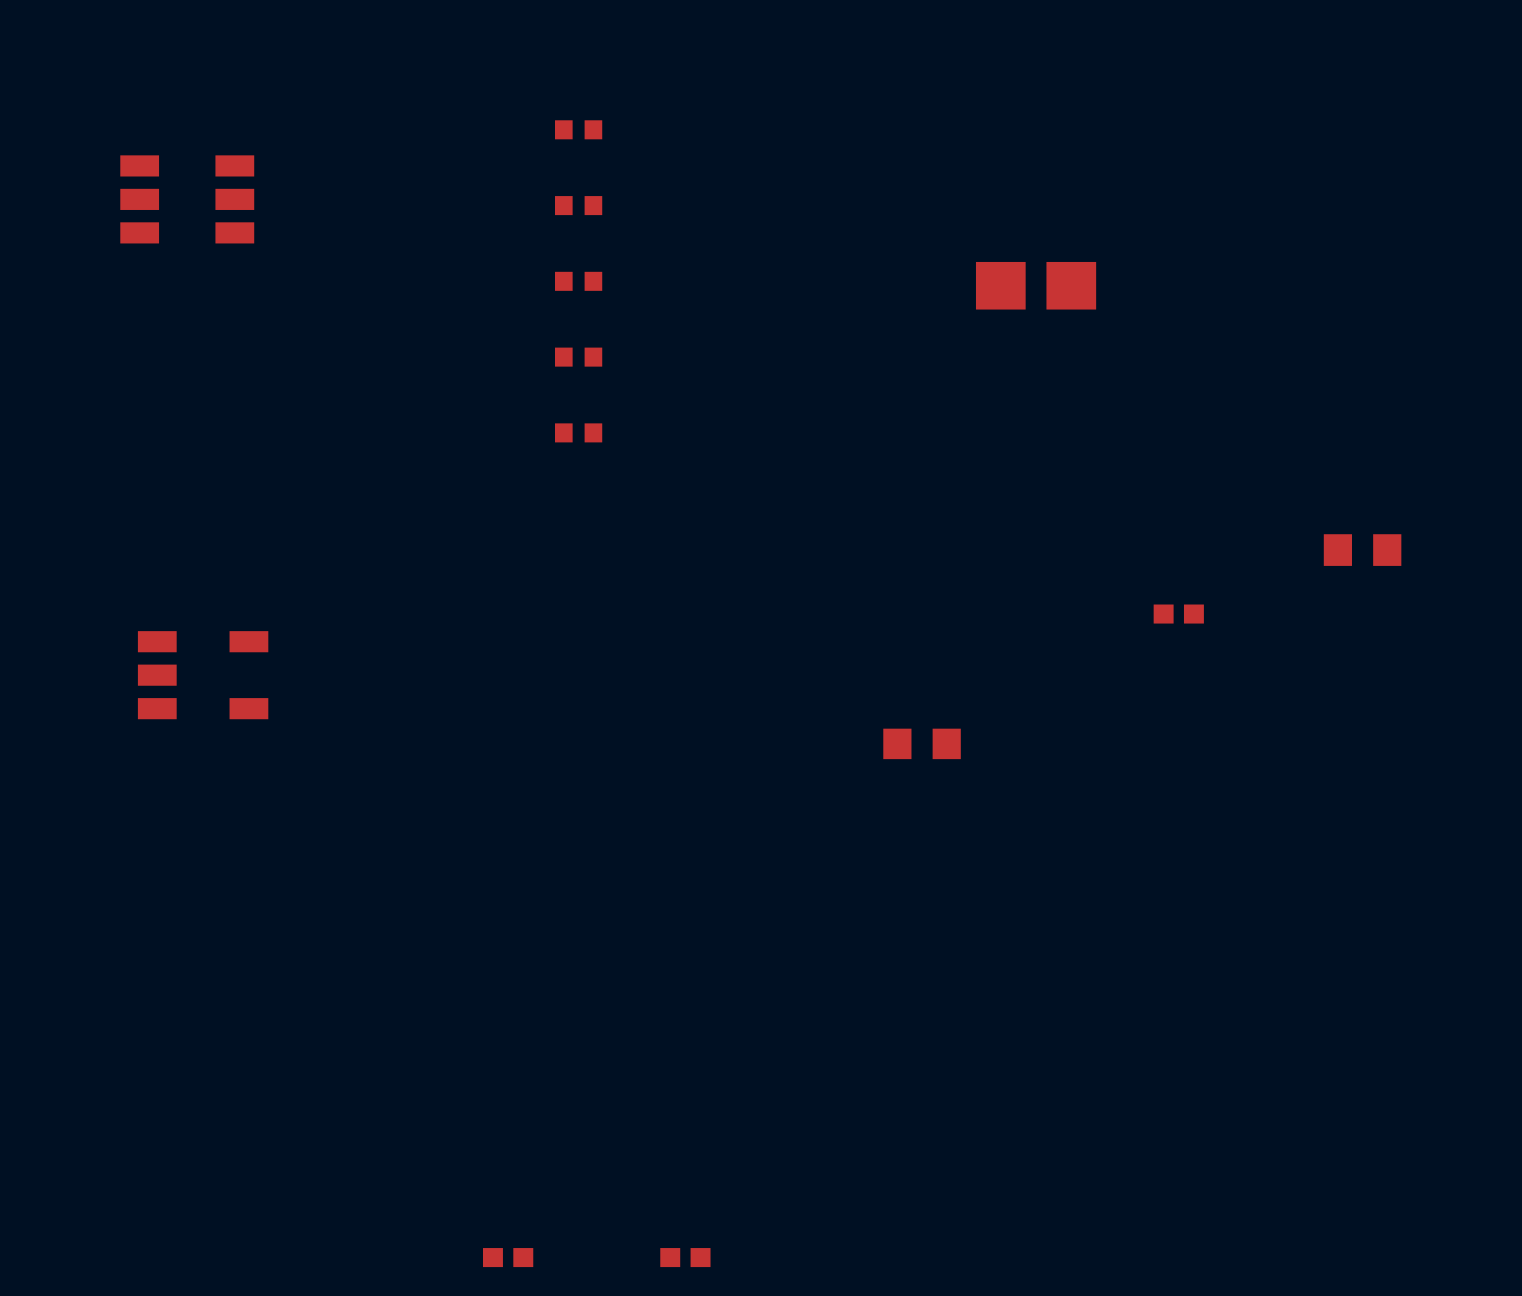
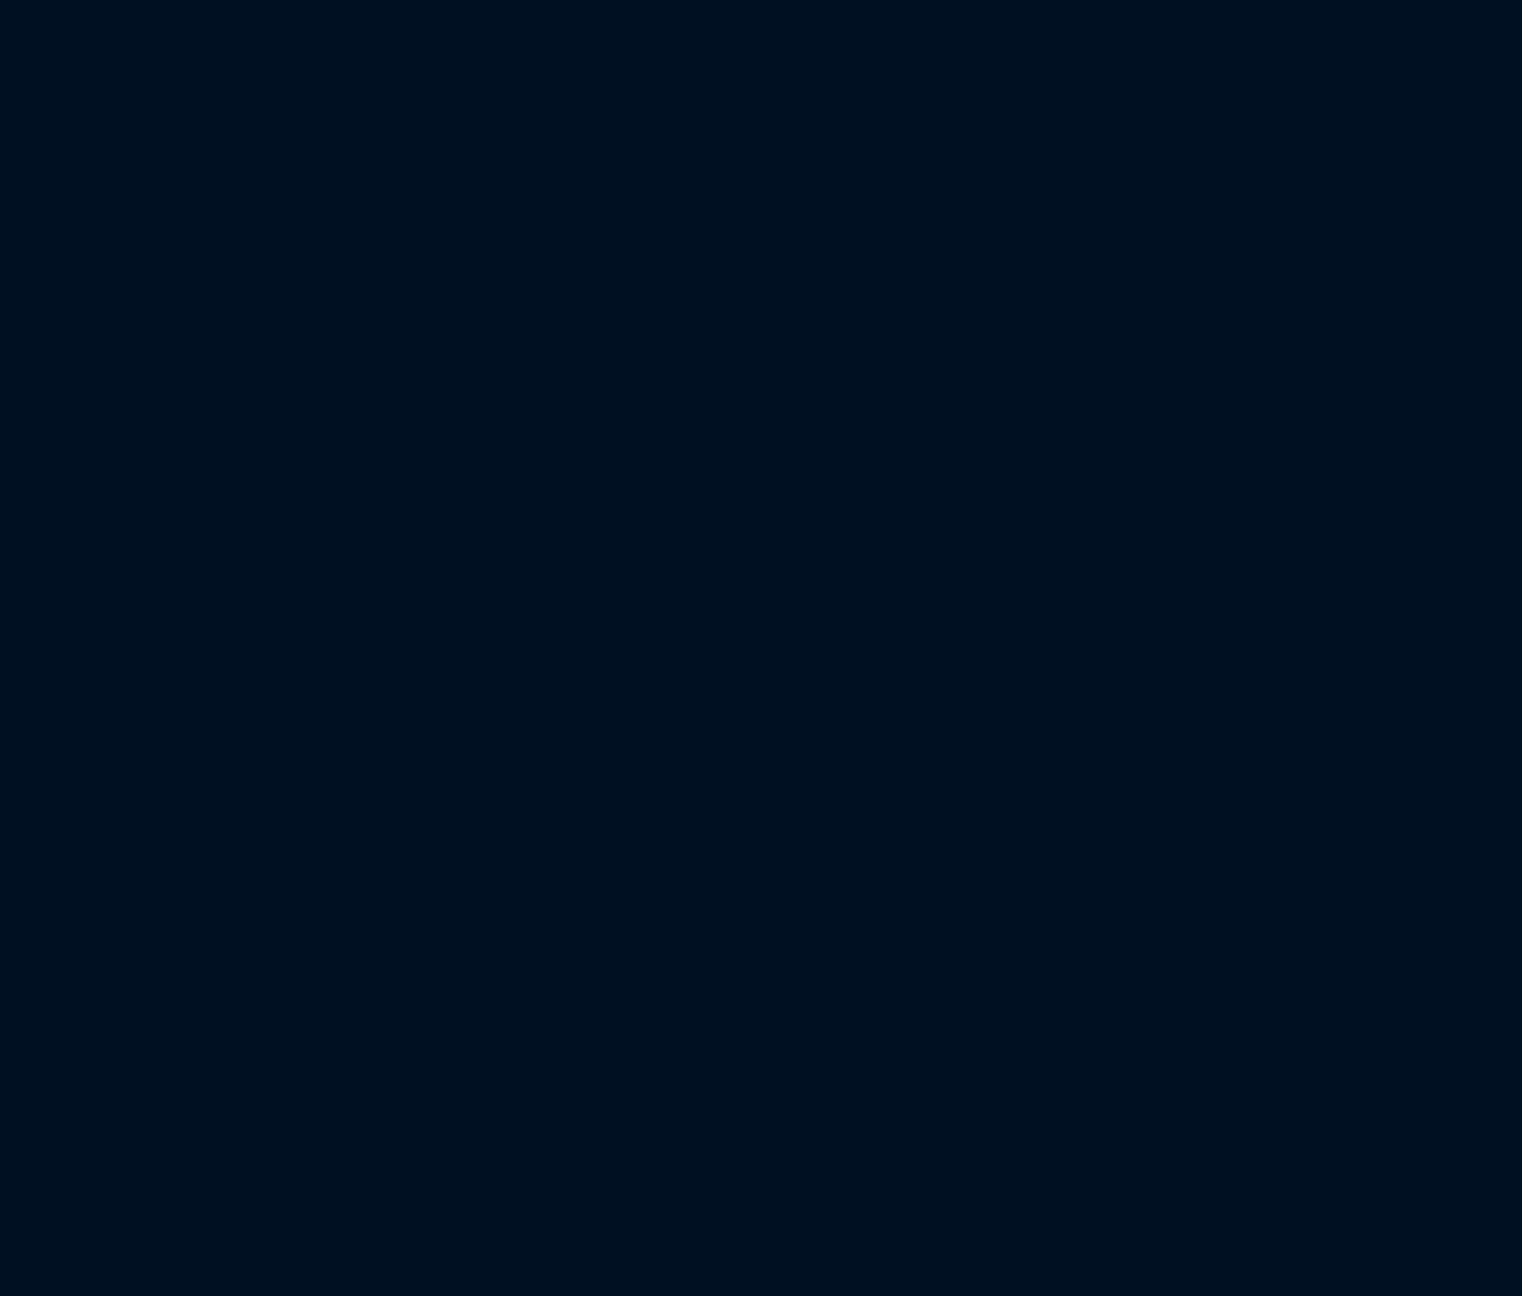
part: (578, 129) -> none
part: (187, 199) -> none
part: (578, 205) -> none
part: (578, 281) -> none
part: (1036, 285) -> none
part: (578, 357) -> none
part: (578, 432) -> none
part: (1362, 550) -> none
part: (1178, 614) -> none
part: (203, 675) -> none
part: (922, 743) -> none
part: (508, 1257) -> none
part: (685, 1257) -> none

